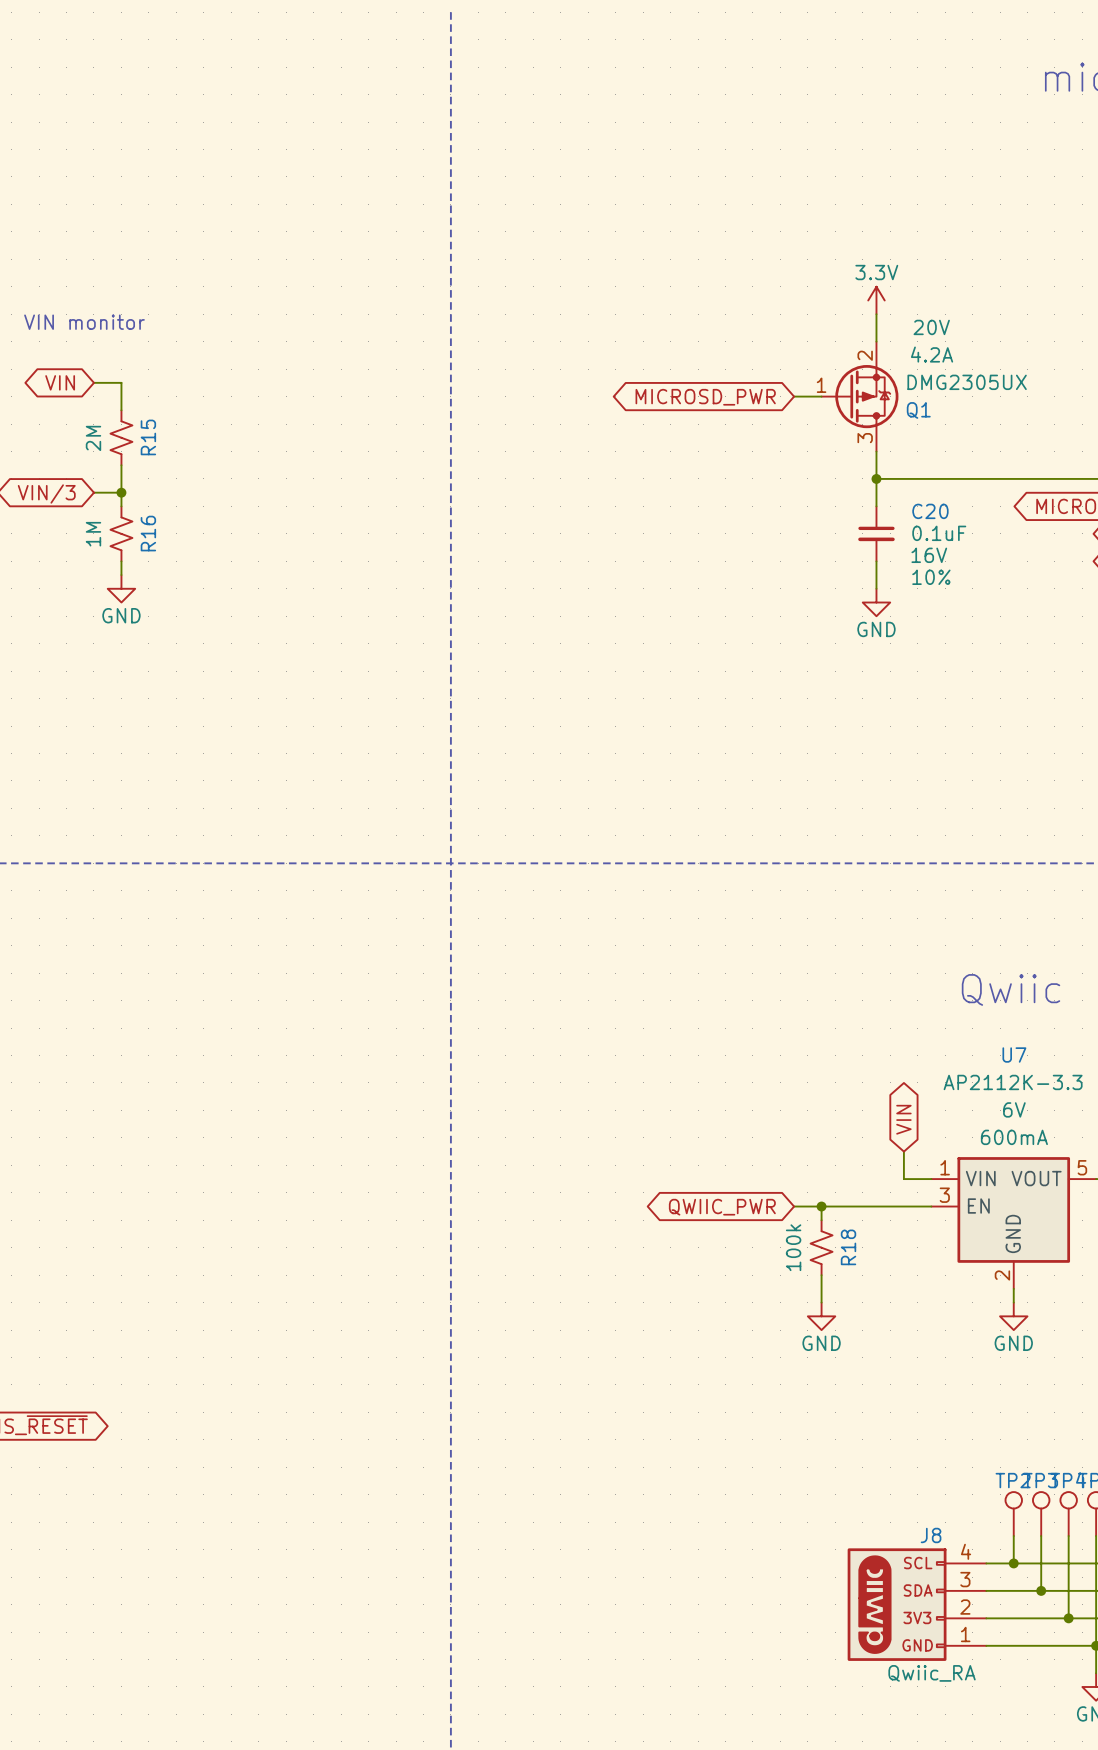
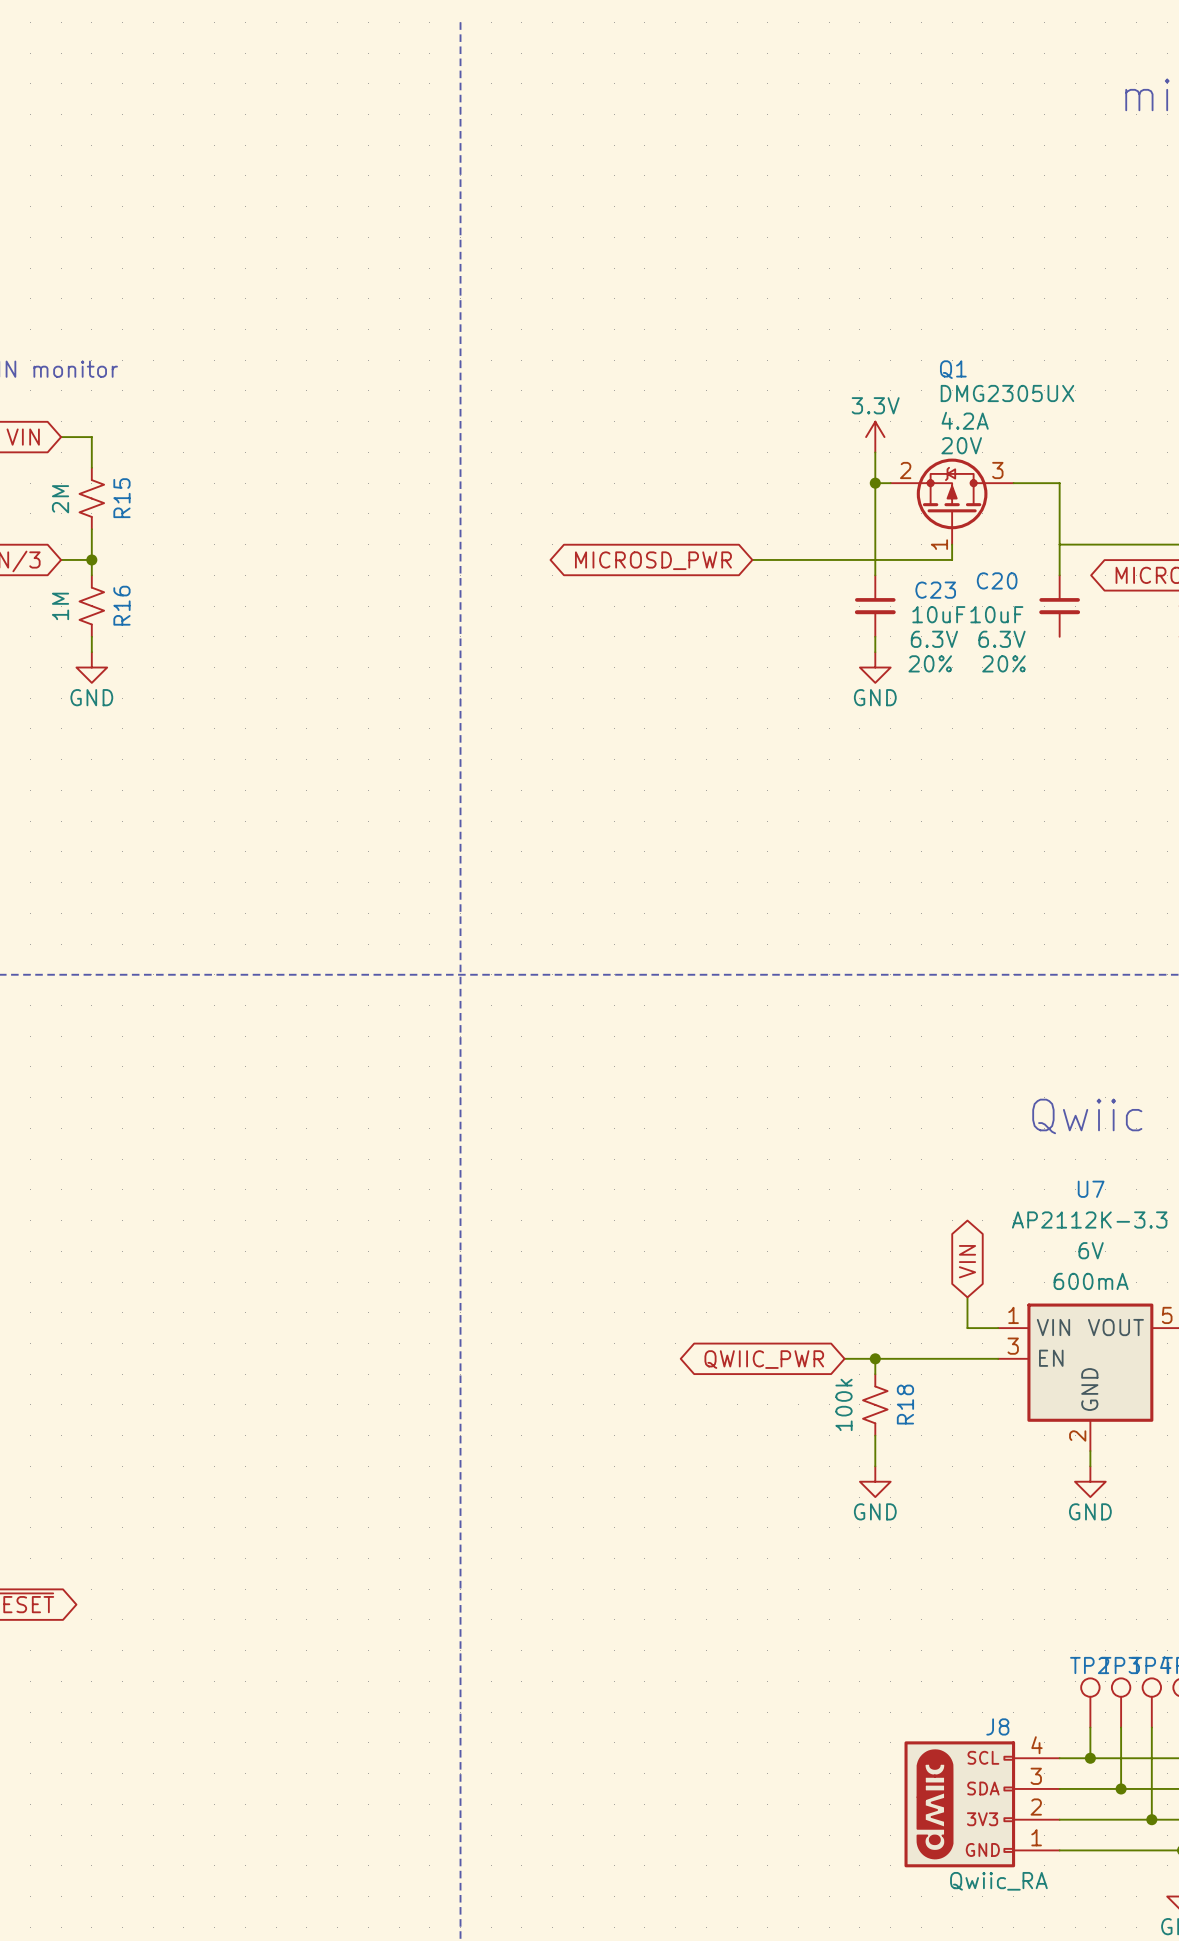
power symbol position: 3.3V (876, 300) -> 3.3V (875, 437)
wire: (876, 314) (876, 341) -> none
Q1 text position: 20V (931, 327) -> 20V (961, 445)
Q1 text position: 4.2A (932, 354) -> 4.2A (965, 420)
Q1 value position: DMG2305UX (967, 382) -> DMG2305UX (1007, 393)
wire: (794, 396) (821, 396) -> (875, 575) (875, 452)
Q1 rotation: 0° (860, 396) -> 90° counterclockwise (952, 501)
global label position: MICROSD_PWR (705, 397) -> MICROSD_PWR (653, 560)
Q1 name position: Q1 (918, 410) -> Q1 (953, 369)
wire: none -> (875, 483) (890, 483)
junction: none -> (875, 483)
wire: none -> (1013, 483) (1059, 483) (1059, 575)
wire: (876, 451) (876, 506) -> none
wire: (876, 478) (986, 478) -> none
junction: (876, 478) -> none
wire: none -> (952, 544) (952, 559) (752, 559)
C23: none -> 10uF (875, 606)
C20 position: (876, 533) -> (1059, 606)
C20 value: 0.1uF (939, 533) -> 10uF (996, 614)
C20 text: 16V (929, 555) -> 6.3V (1002, 639)
wire: none -> (875, 636) (875, 652)
wire: (876, 561) (876, 588) -> none
C20 text: 10% (931, 577) -> 20% (1003, 663)
power symbol position: GND (876, 602) -> GND (875, 667)

